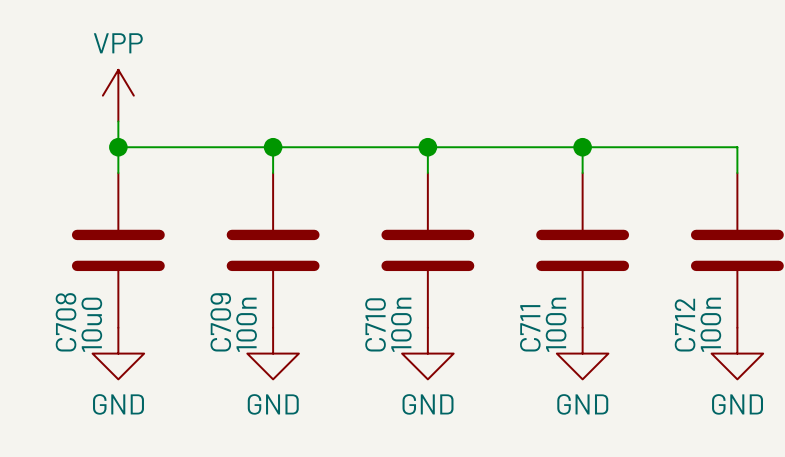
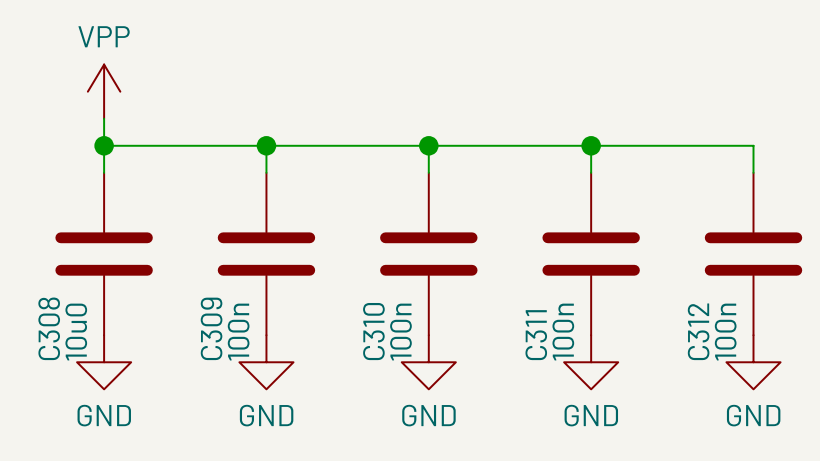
C708 name: C708 (66, 322) -> C308 (49, 328)
C709 name: C709 (220, 322) -> C309 (211, 328)
C710 name: C710 (375, 324) -> C310 (373, 331)
C712 name: C712 (685, 325) -> C312 (698, 331)
C711 name: C711 (530, 328) -> C311 (536, 335)

